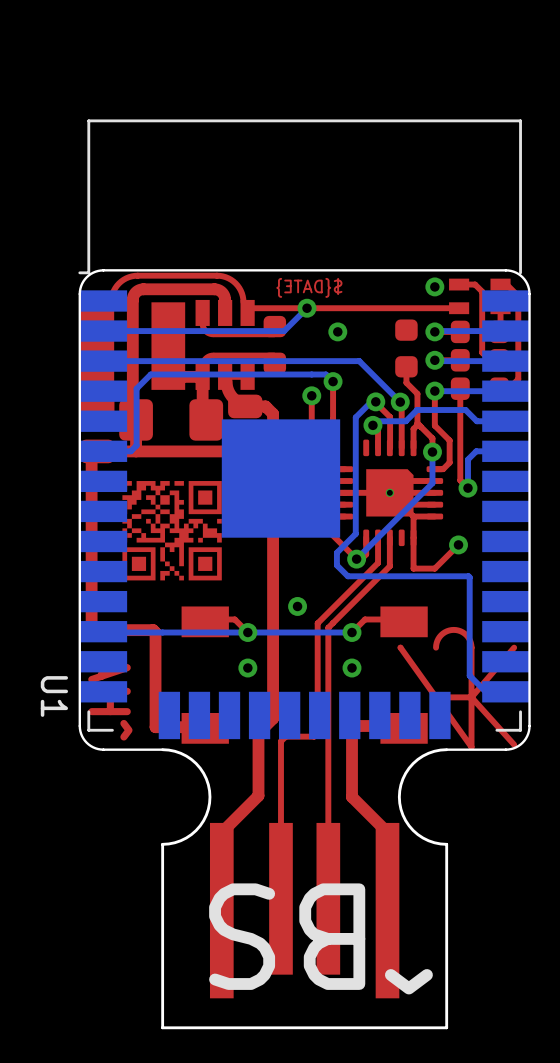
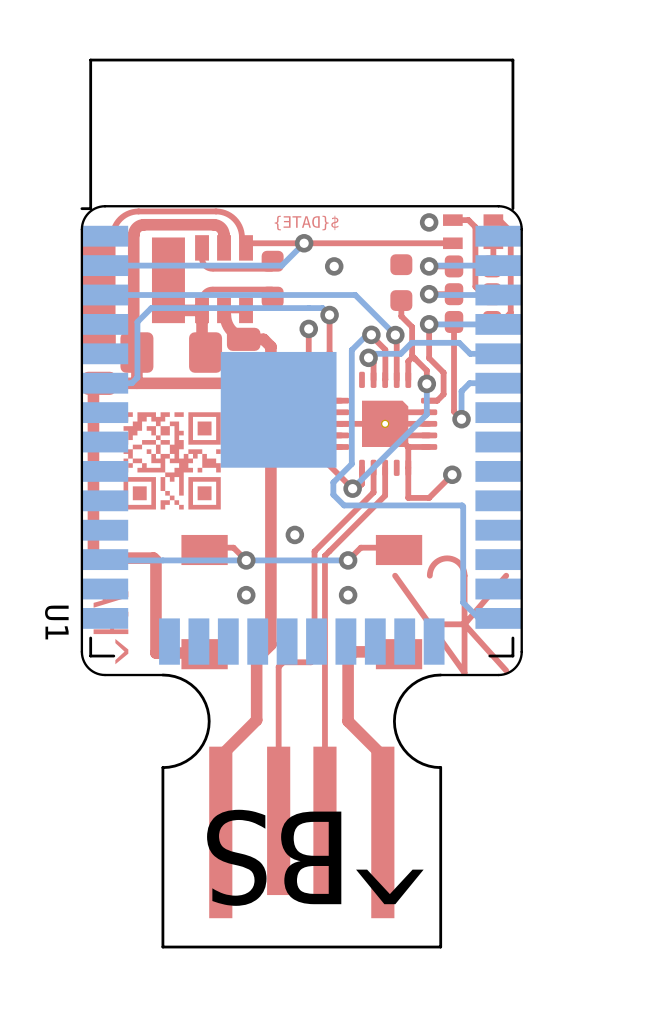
drawing: none -> [392, 555, 510, 676]
part: (457, 688) -> none

